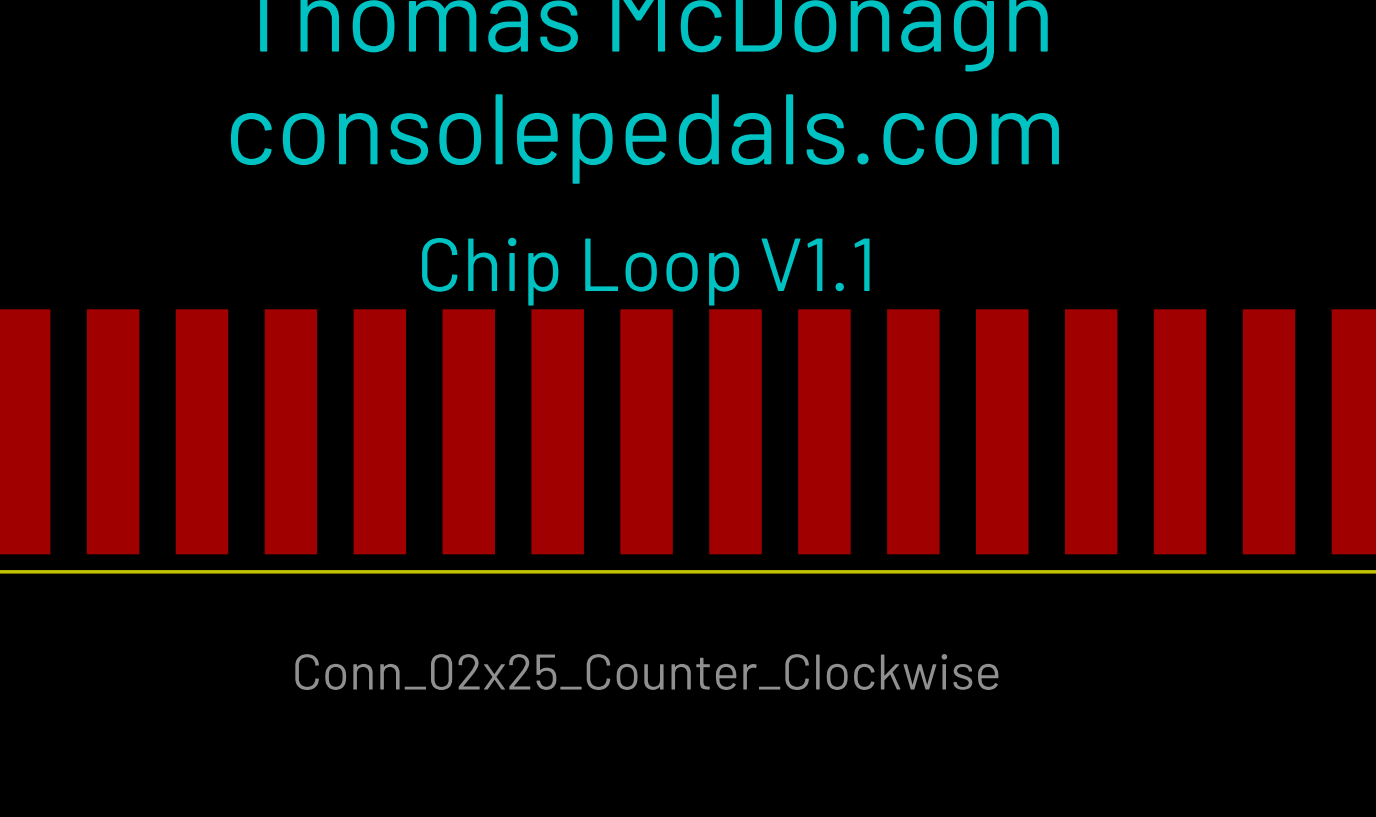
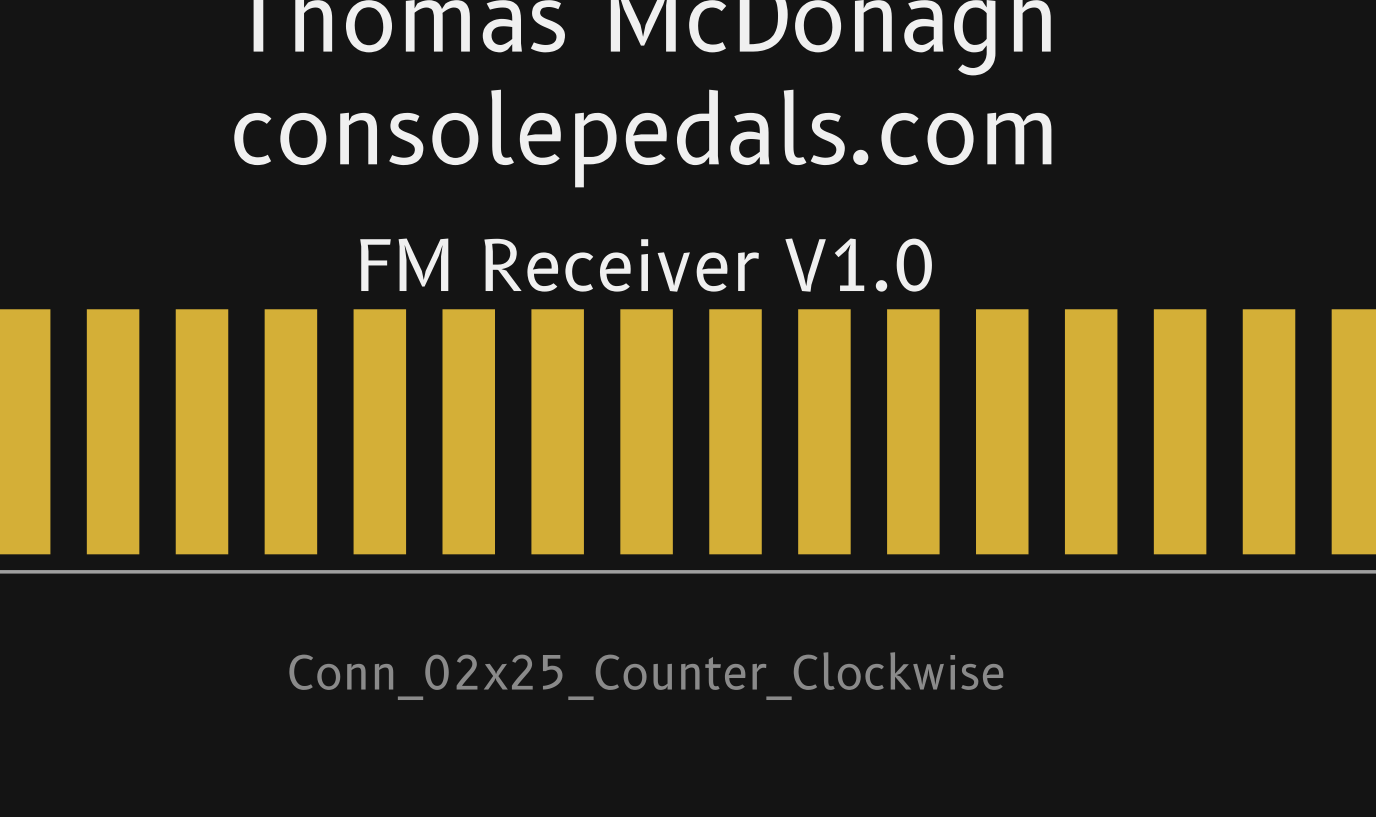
text: Chip Loop V1.1 (645, 271) -> FM Receiver V1.0 (646, 265)

